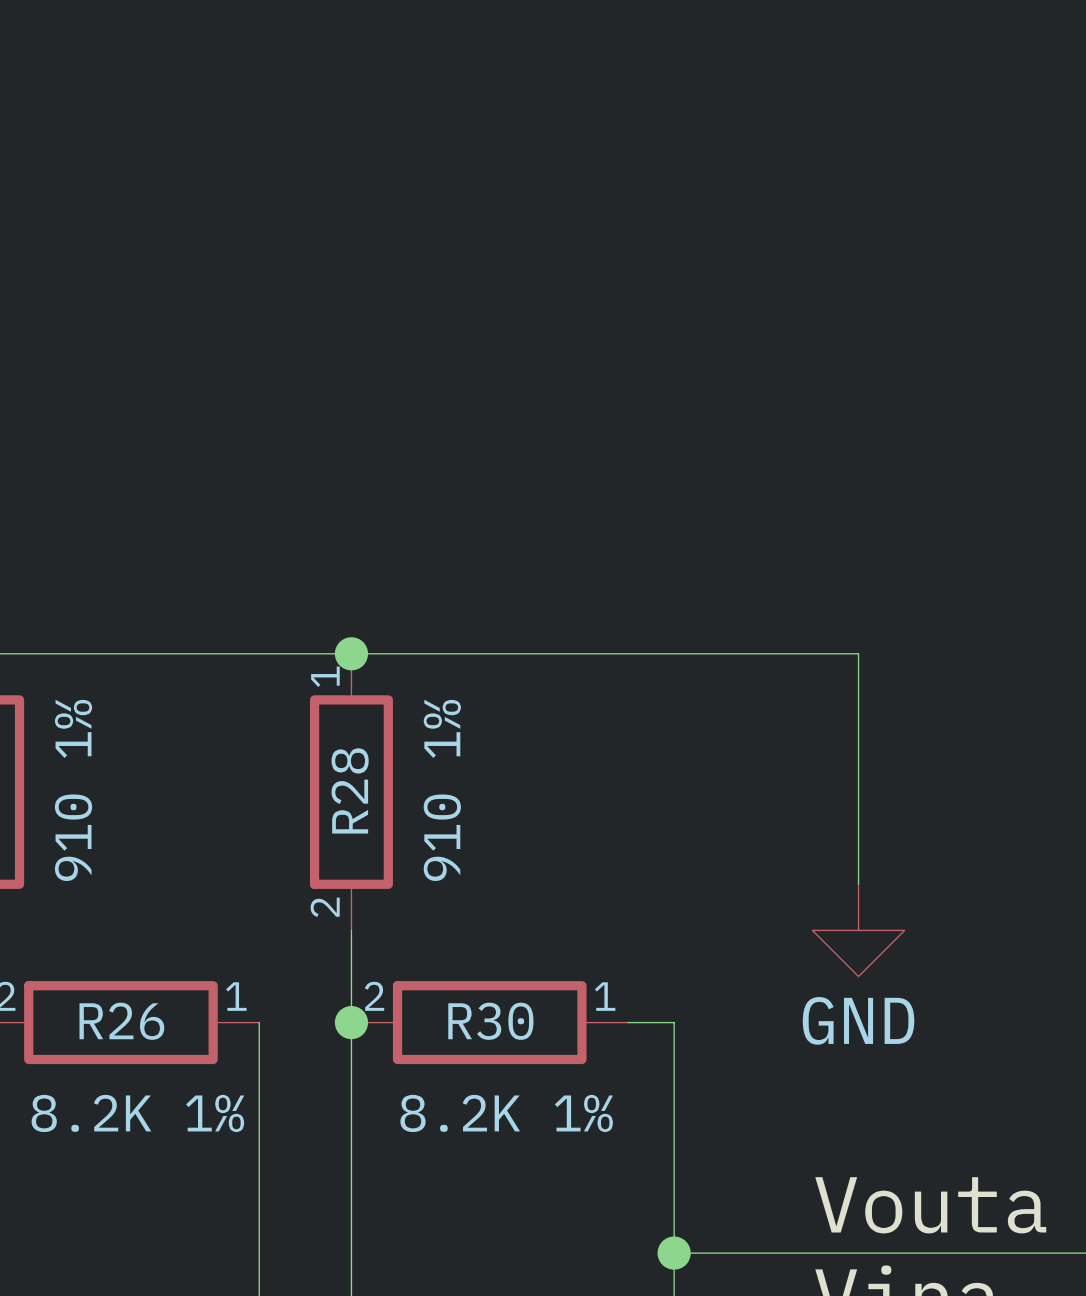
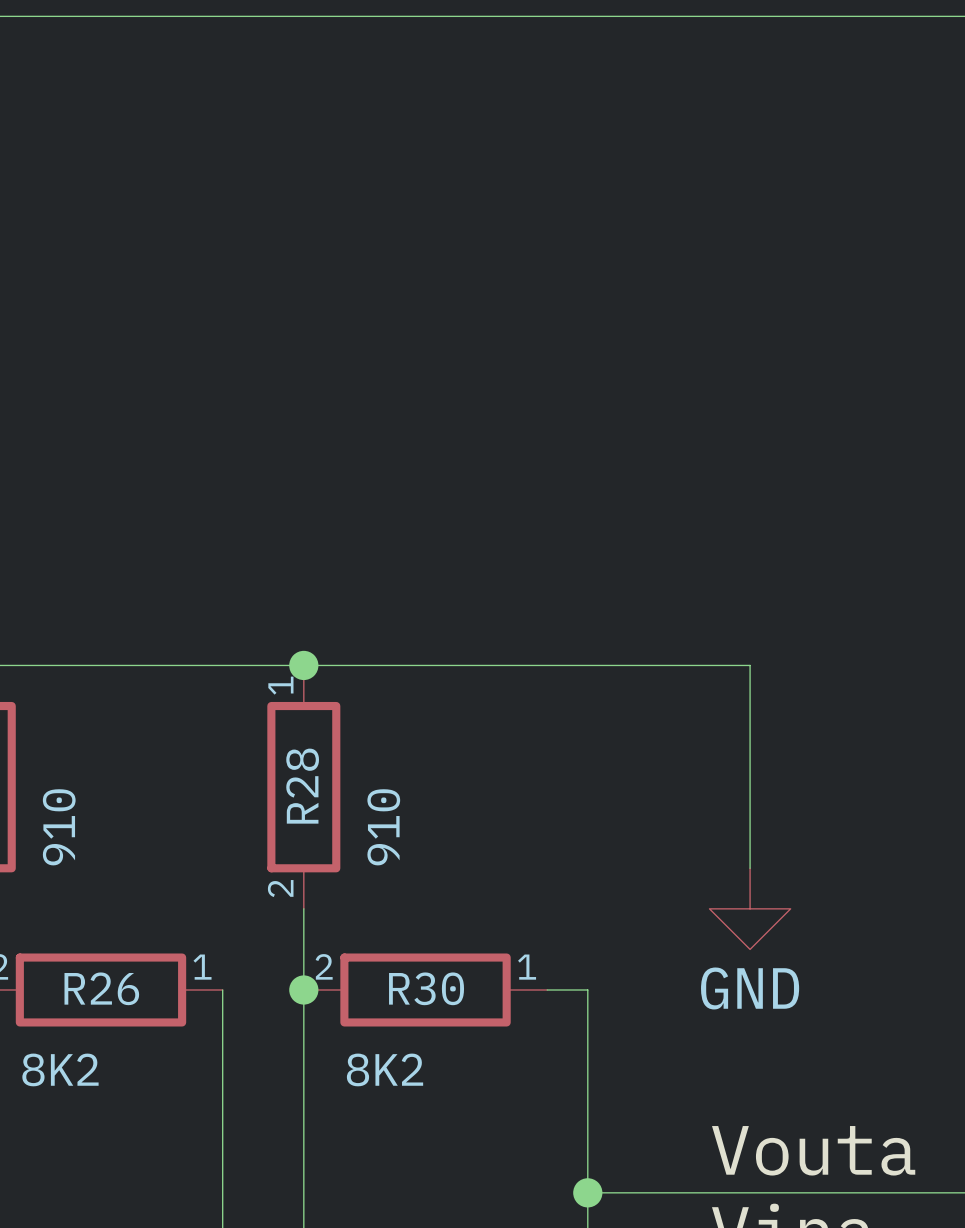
part value: 910 1% (73, 790) -> 910 (59, 827)
R28 value: 910 1% (442, 790) -> 910 (383, 827)
R26 value: 8.2K 1% (137, 1113) -> 8K2 (60, 1069)
R30 value: 8.2K 1% (506, 1113) -> 8K2 (385, 1069)

